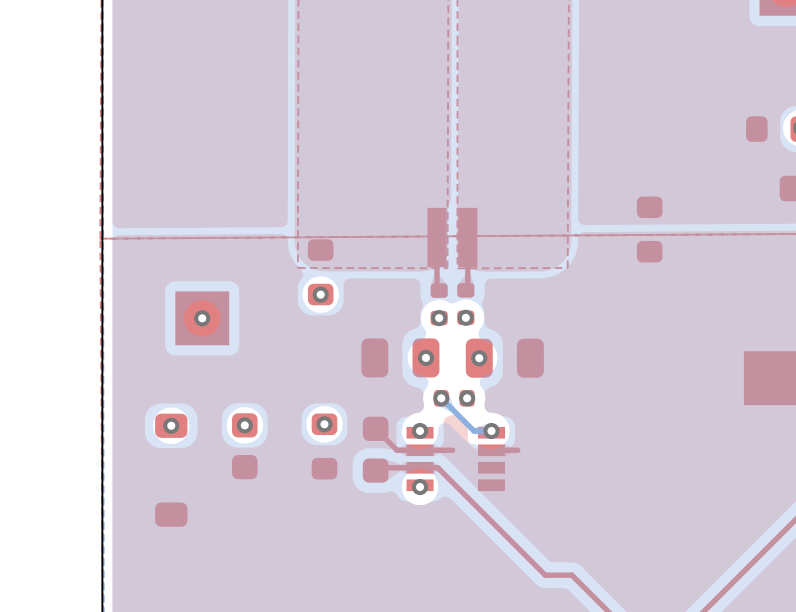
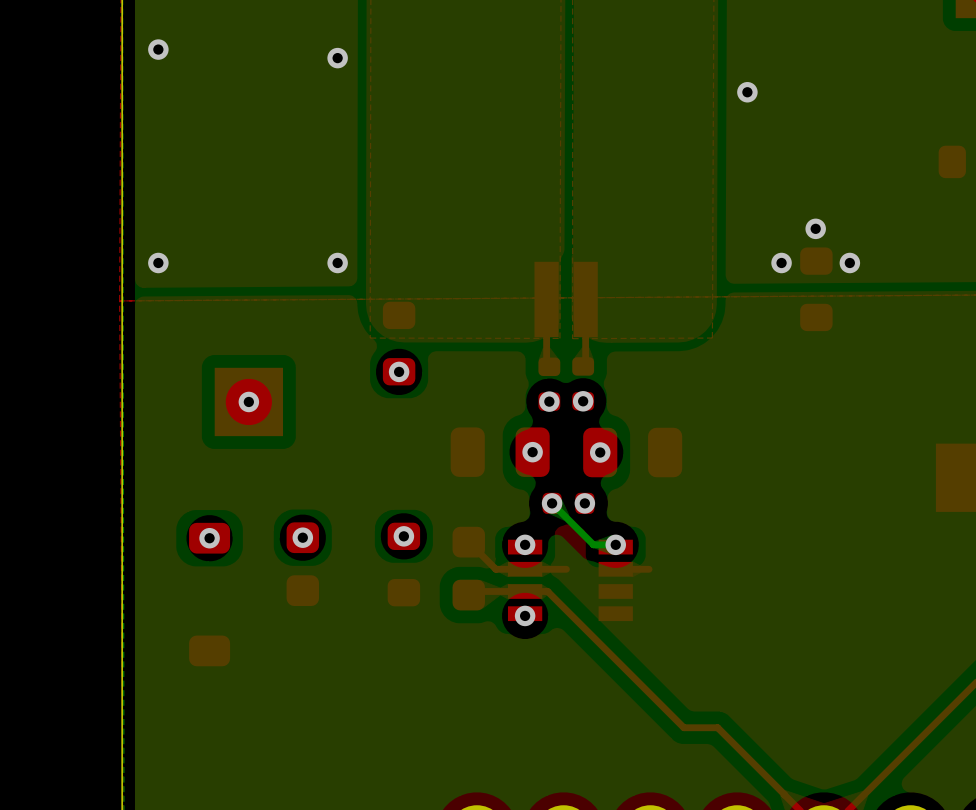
via: none -> (158, 49)
via: none -> (337, 58)
via: none -> (747, 92)
via: none -> (815, 228)
via: none -> (158, 262)
via: none -> (337, 262)
via: none -> (781, 262)
via: none -> (849, 262)

